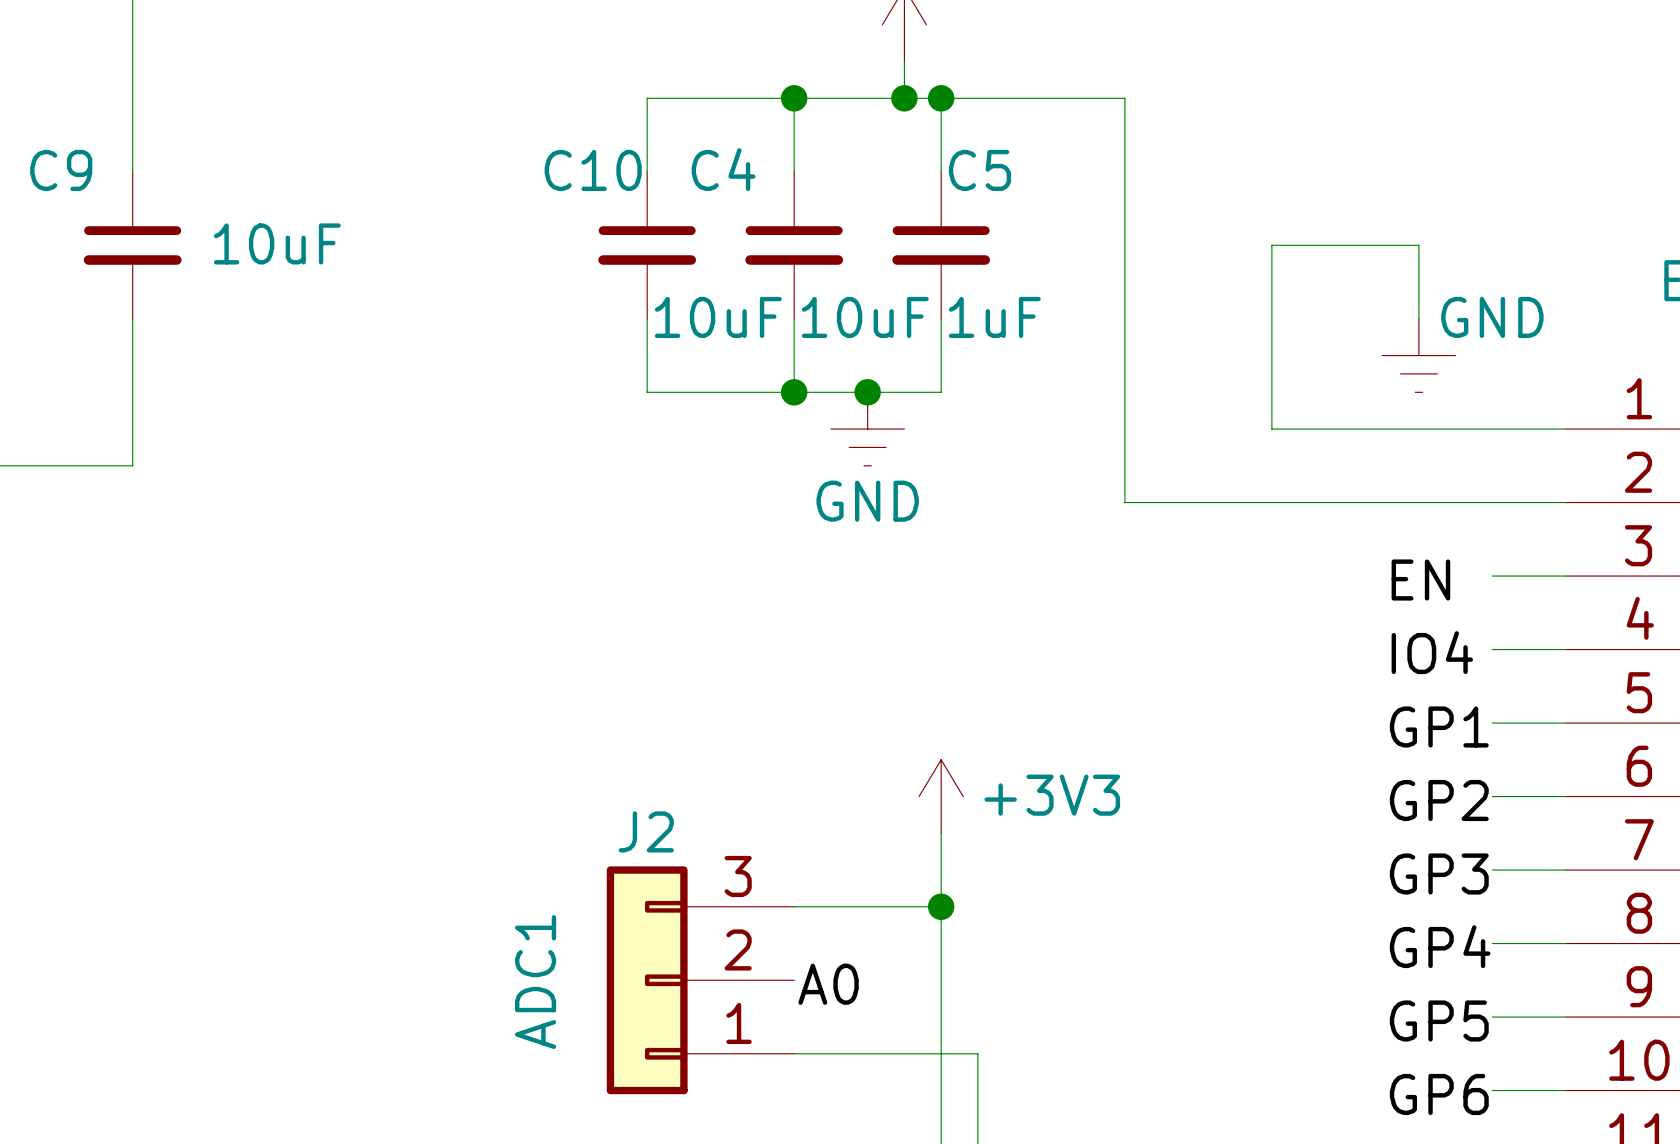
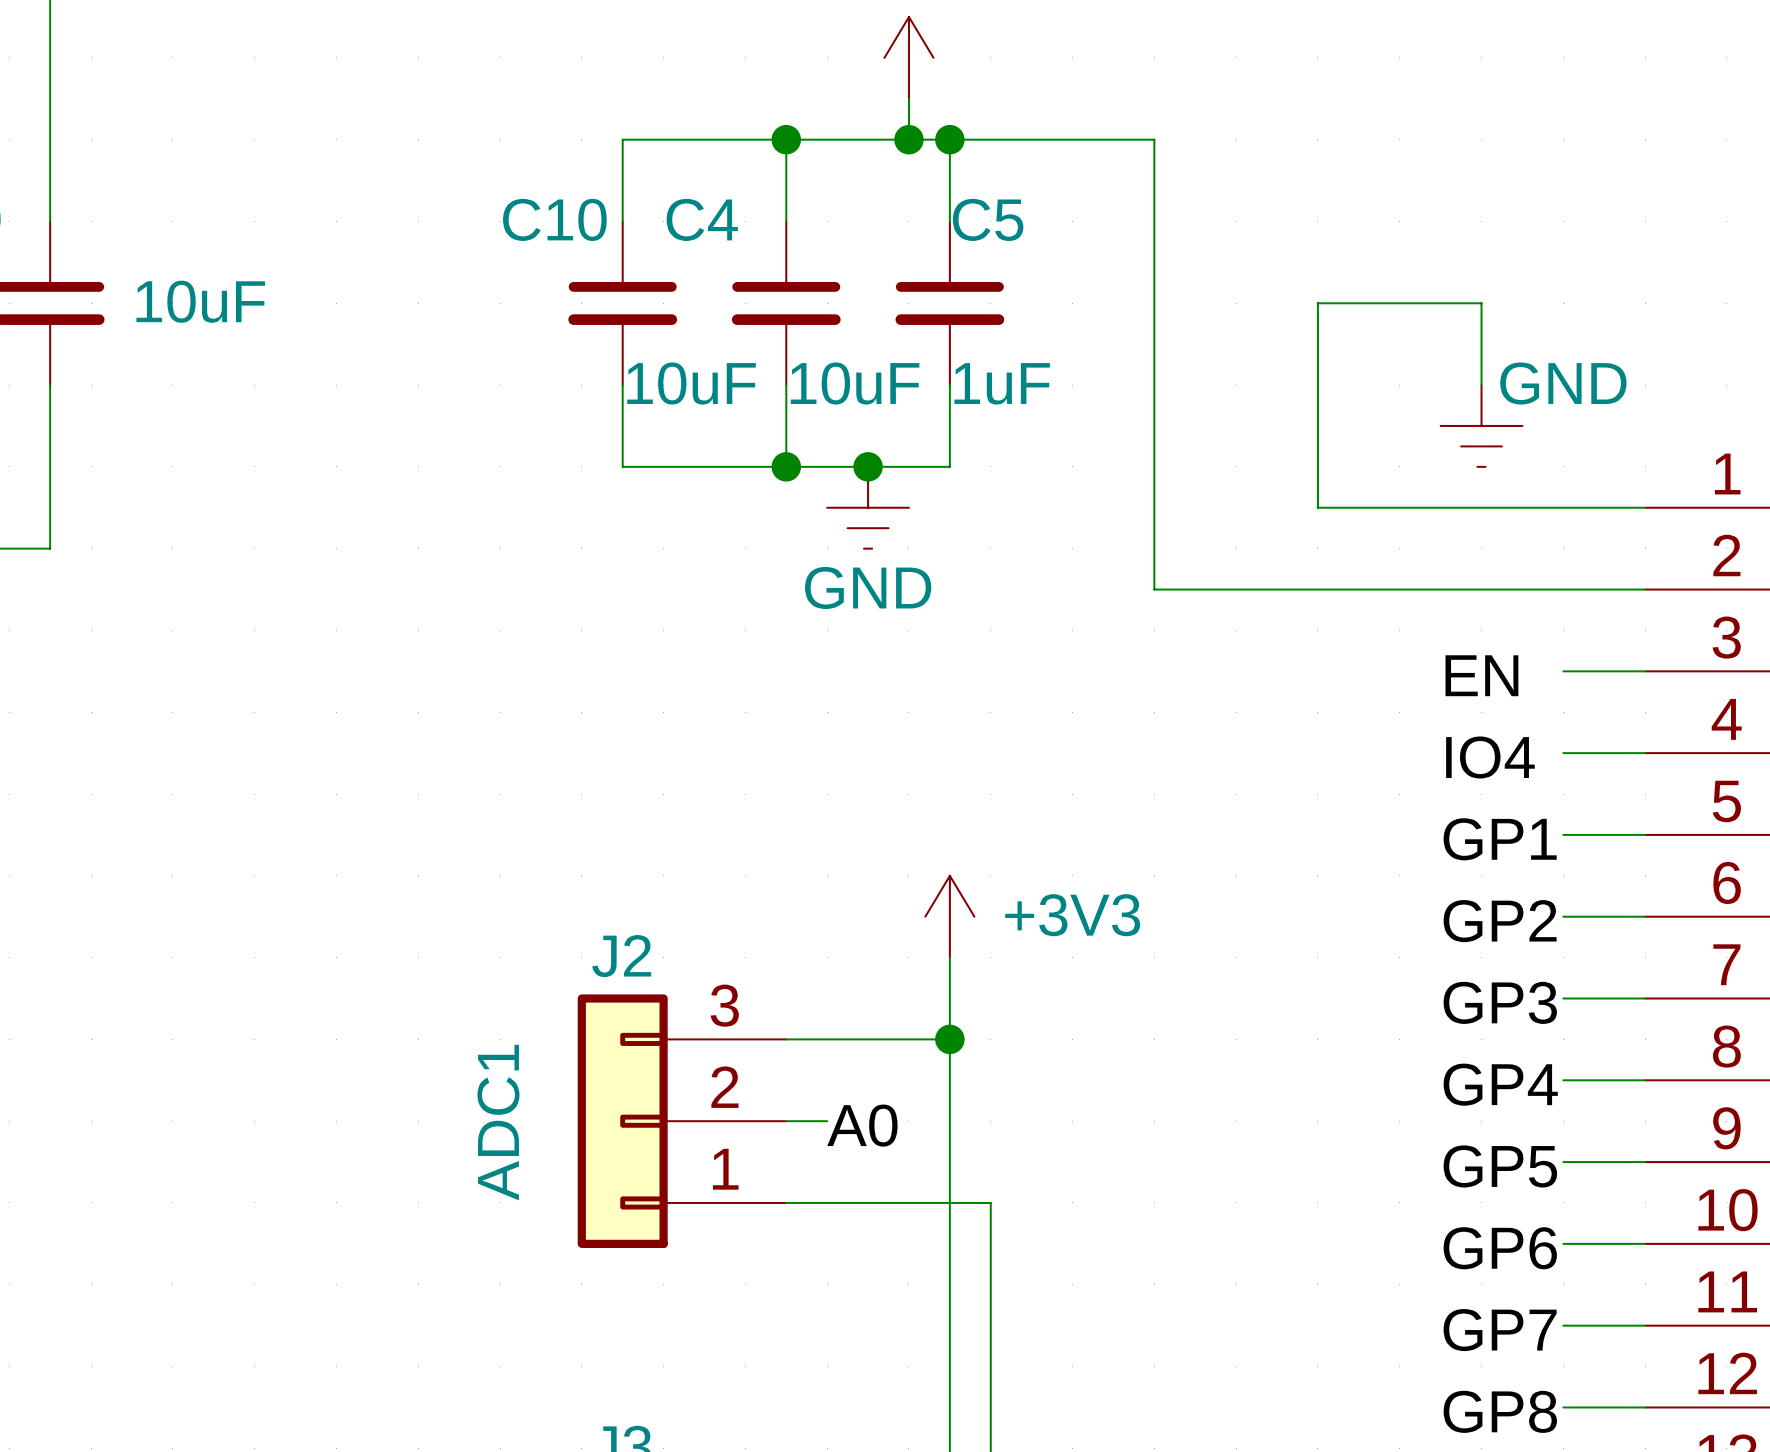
wire: none -> (786, 1121) (827, 1121)
label position: A0 (828, 984) -> A0 (862, 1125)

